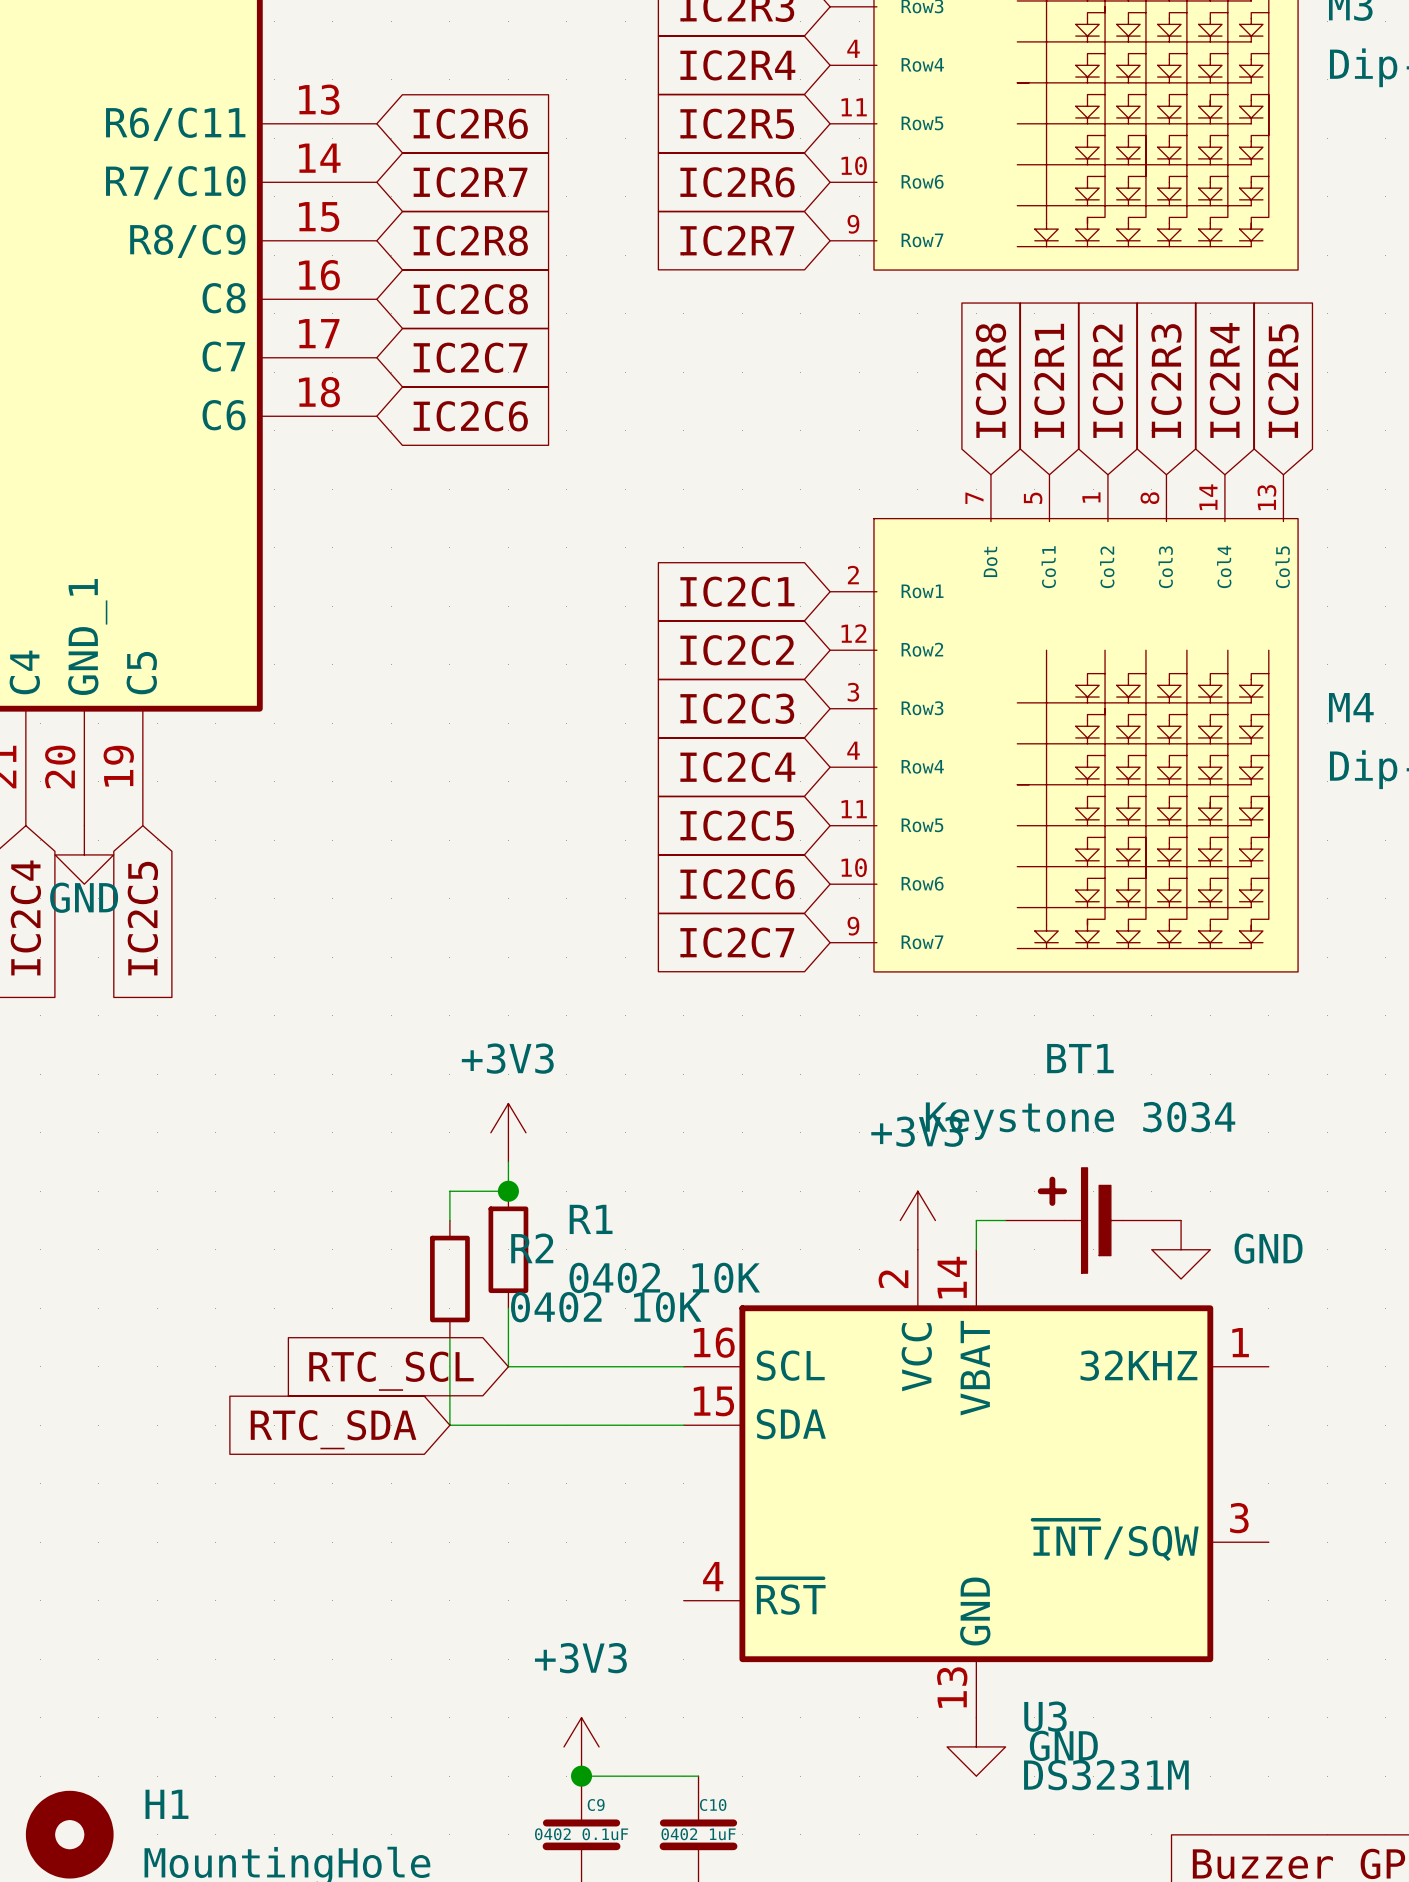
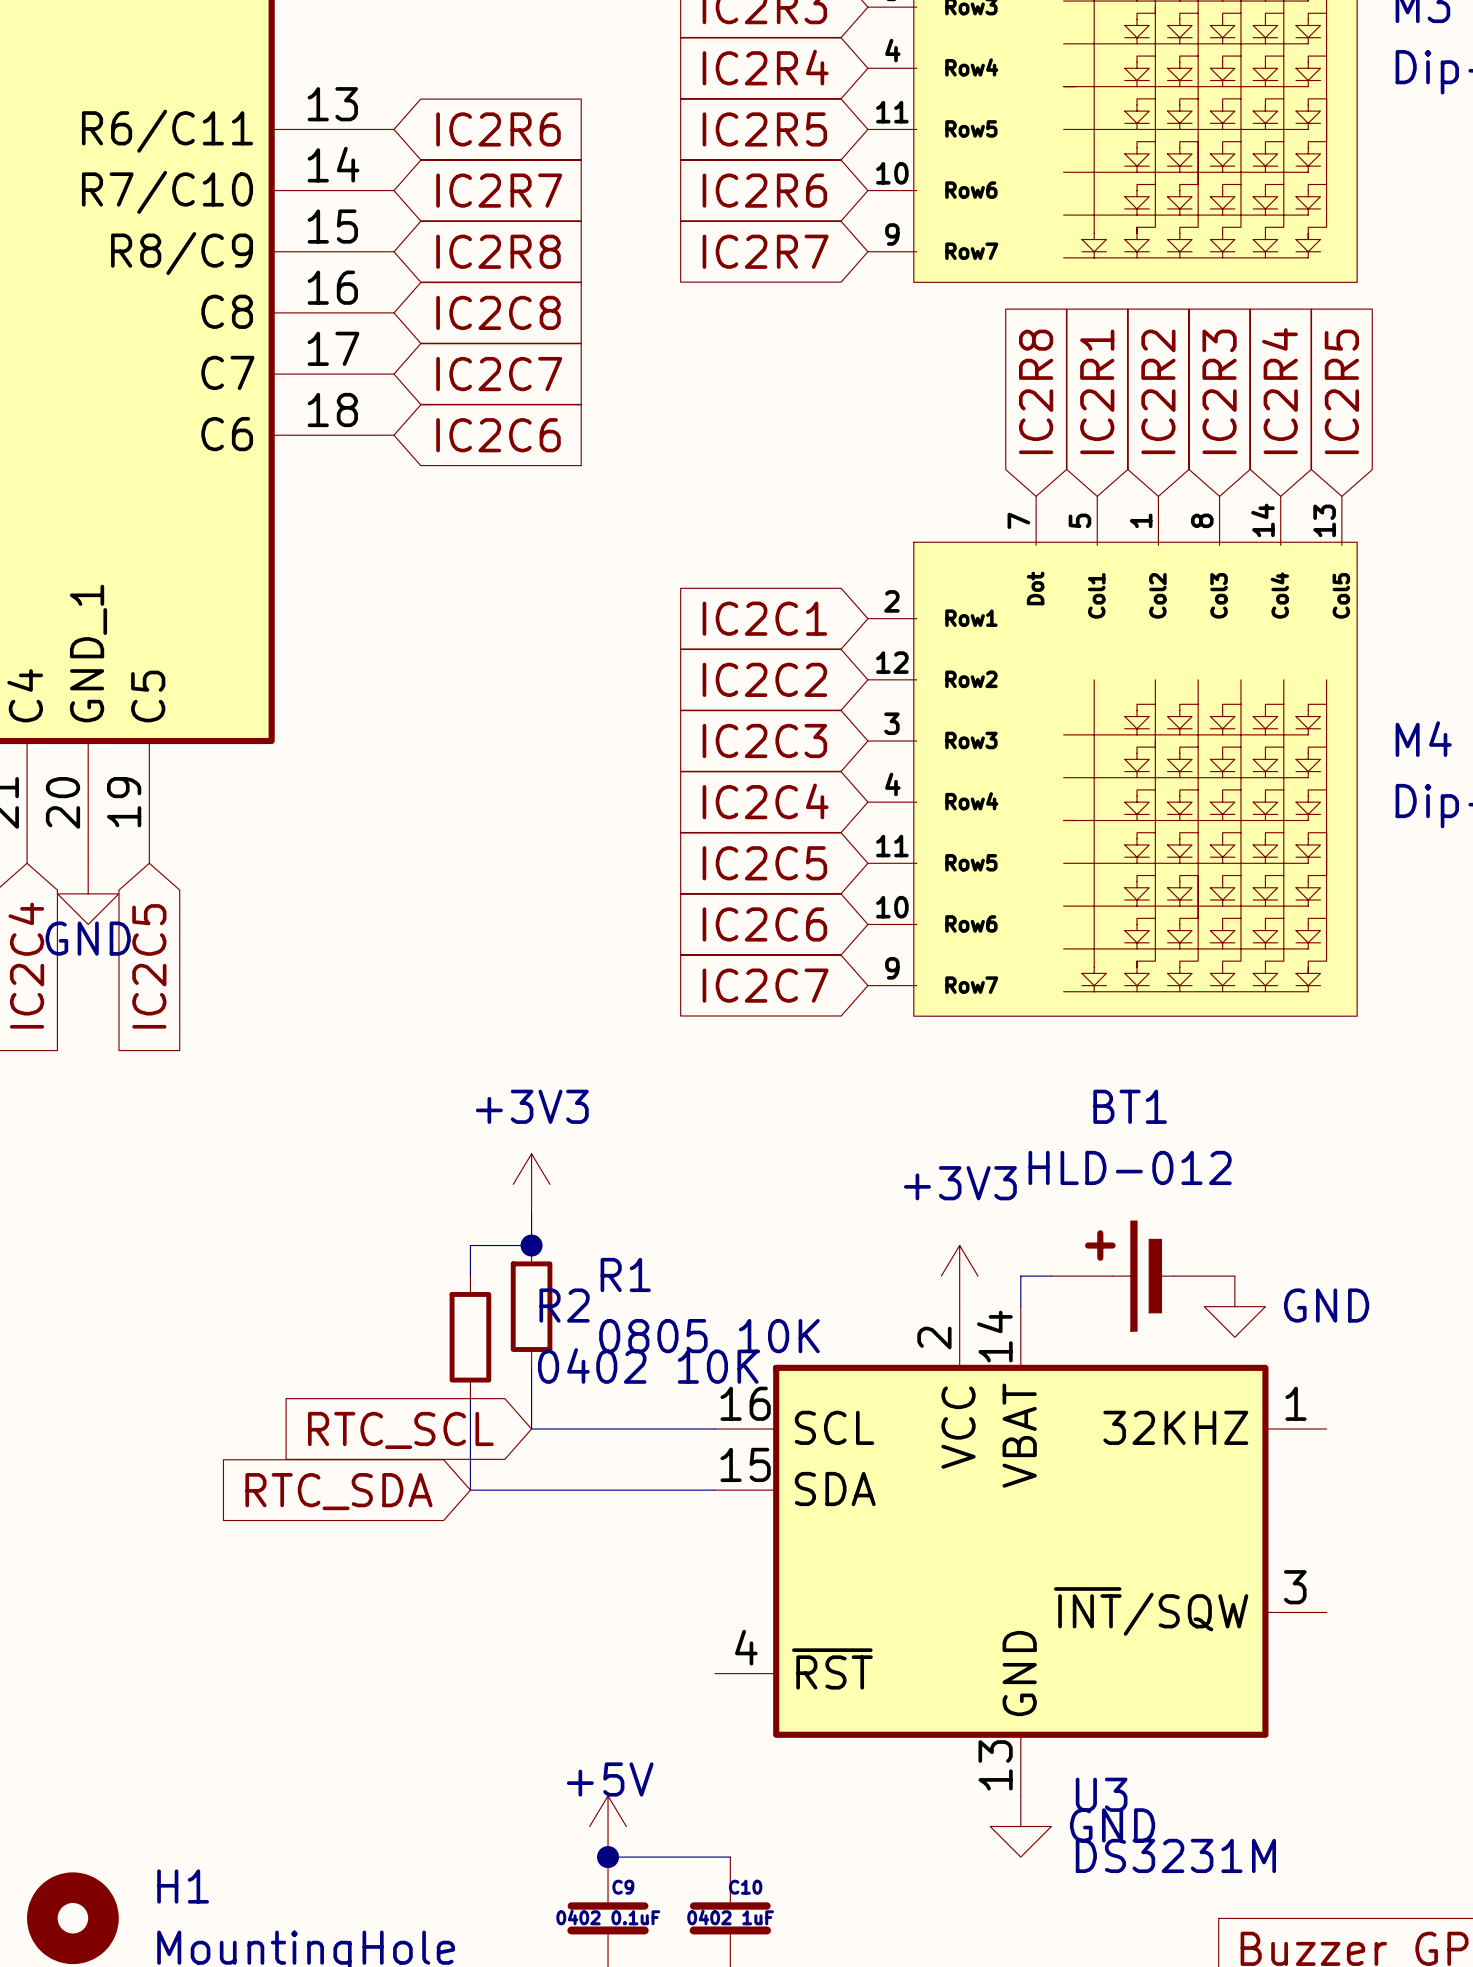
BT1 value: Keystone 3034 (1080, 1120) -> HLD-012 (1130, 1167)
R1 value: 0402 10K (664, 1277) -> 0805 10K (709, 1336)
power symbol: +3V3 (581, 1746) -> +5V (608, 1826)

